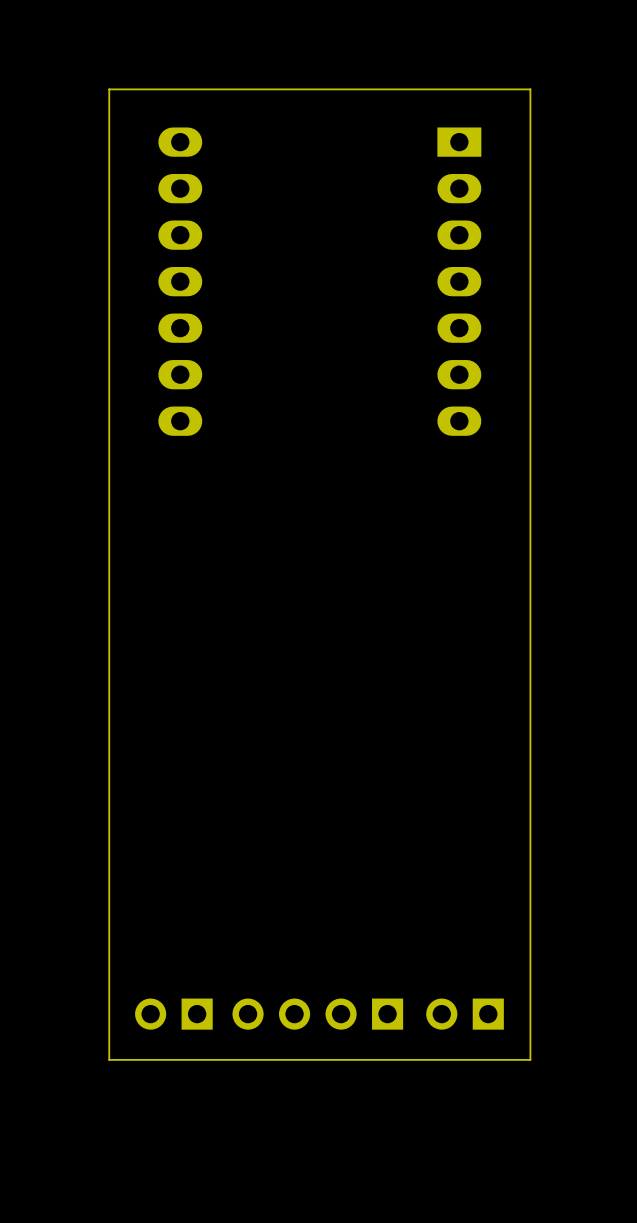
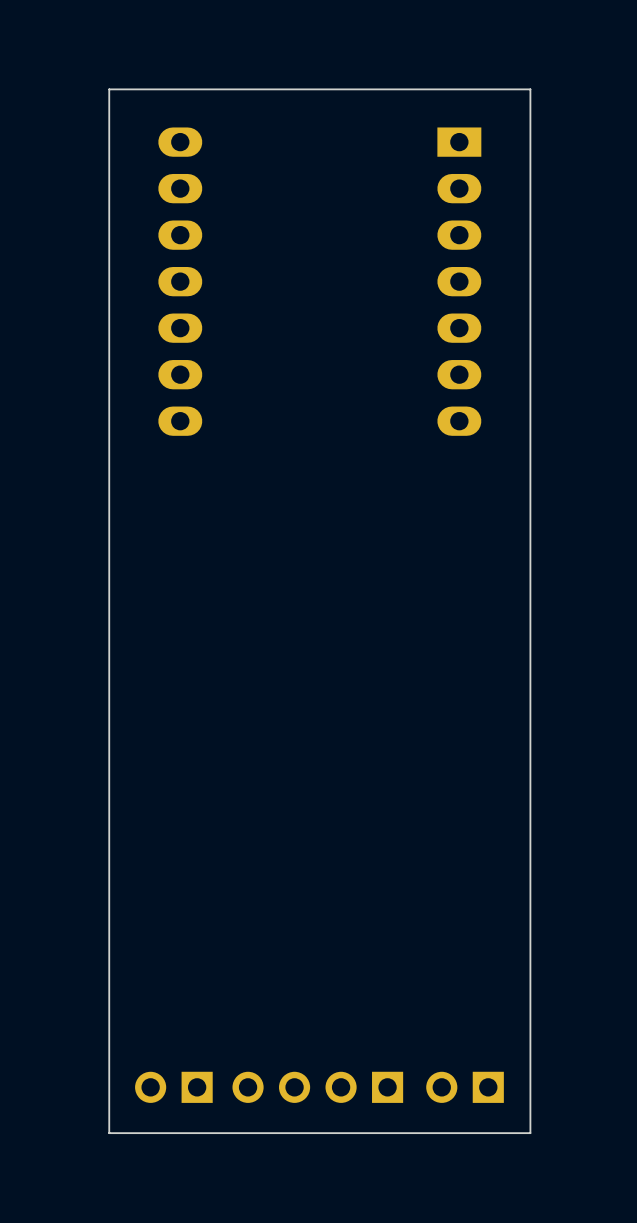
part position: (173, 1014) -> (173, 1087)
part position: (317, 1014) -> (317, 1087)
part position: (465, 1014) -> (465, 1087)
board edge: (530, 1059) (109, 1059) -> (530, 1059) (530, 1133) (109, 1133) (109, 1059)

